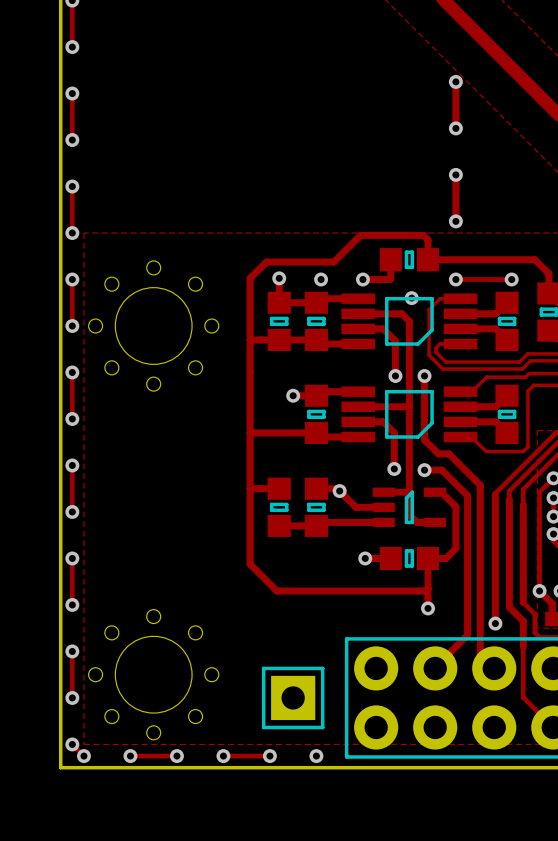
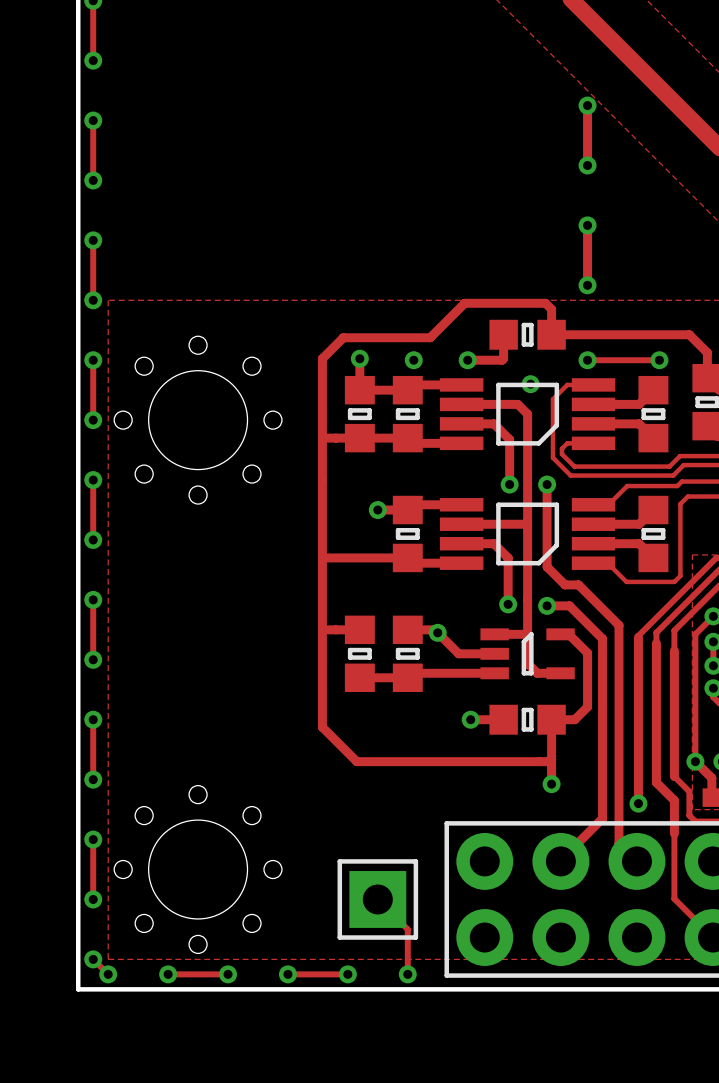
track: none -> (377, 899) (407, 929) (407, 974)

